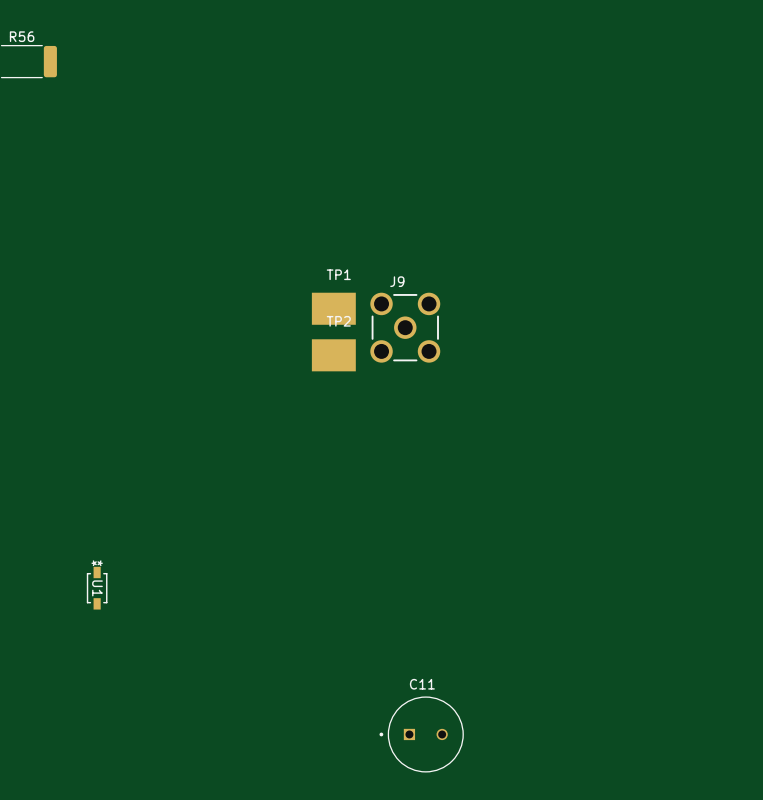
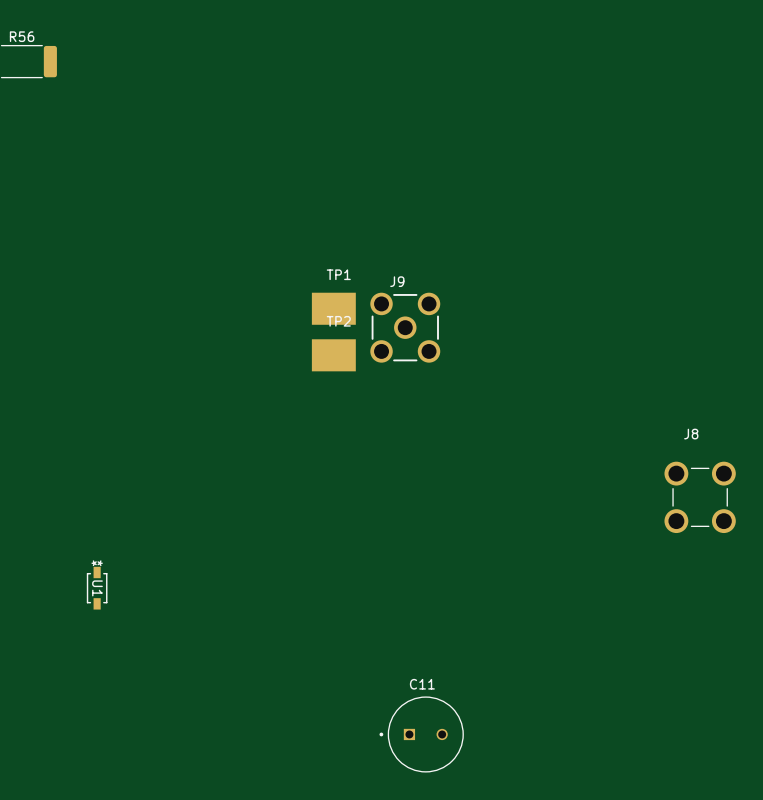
J8: none -> (700, 497)

